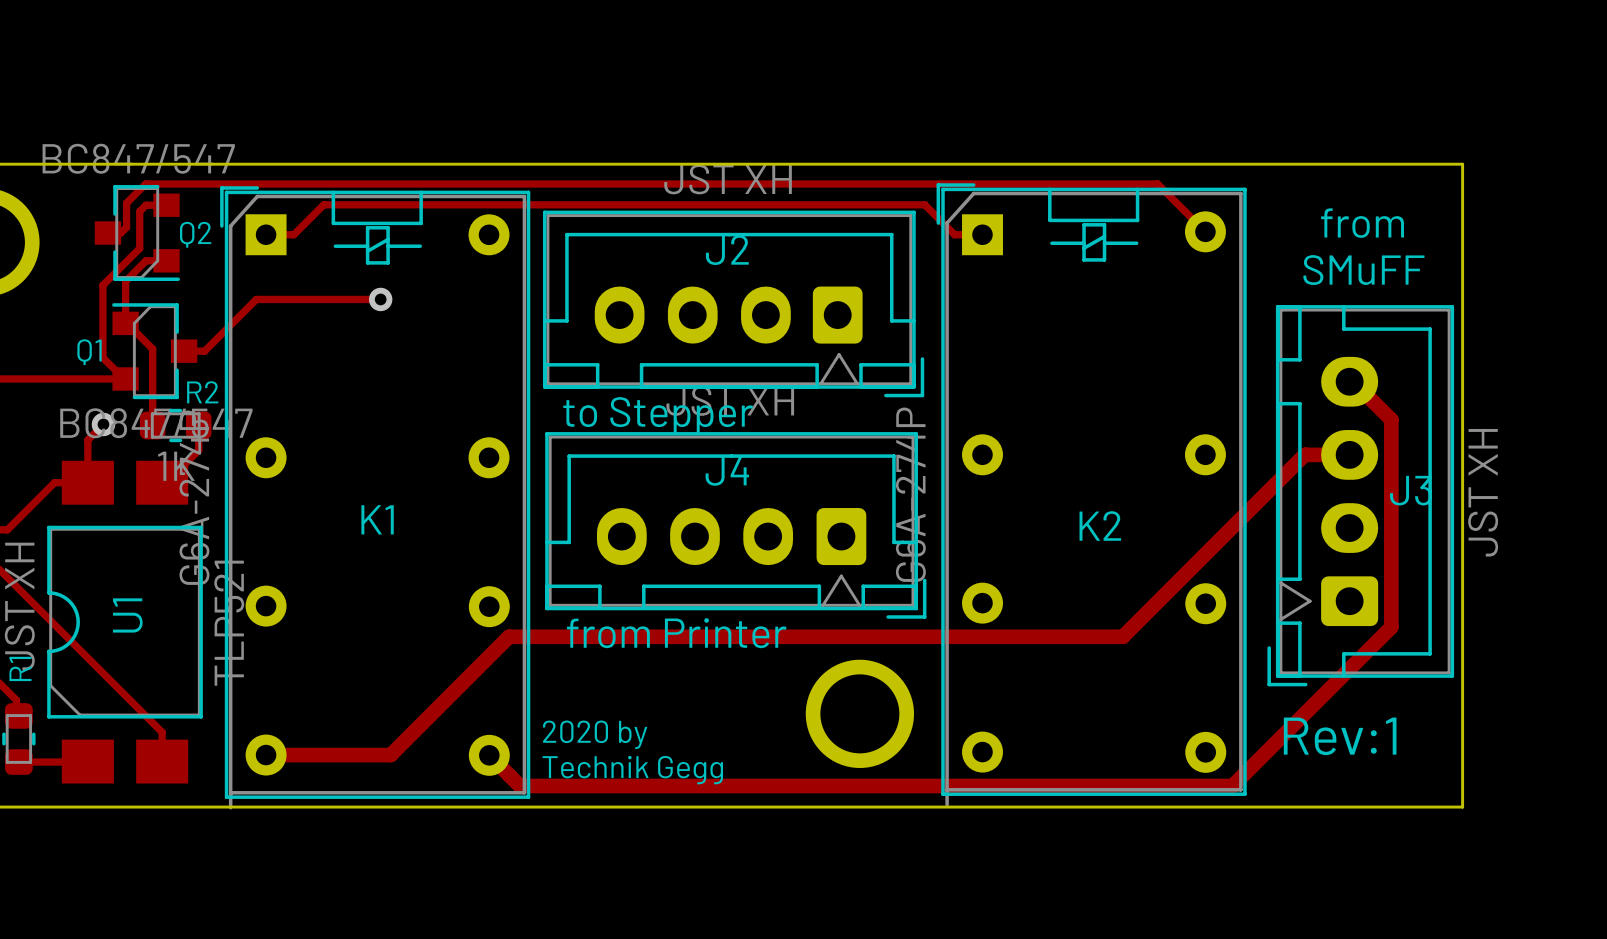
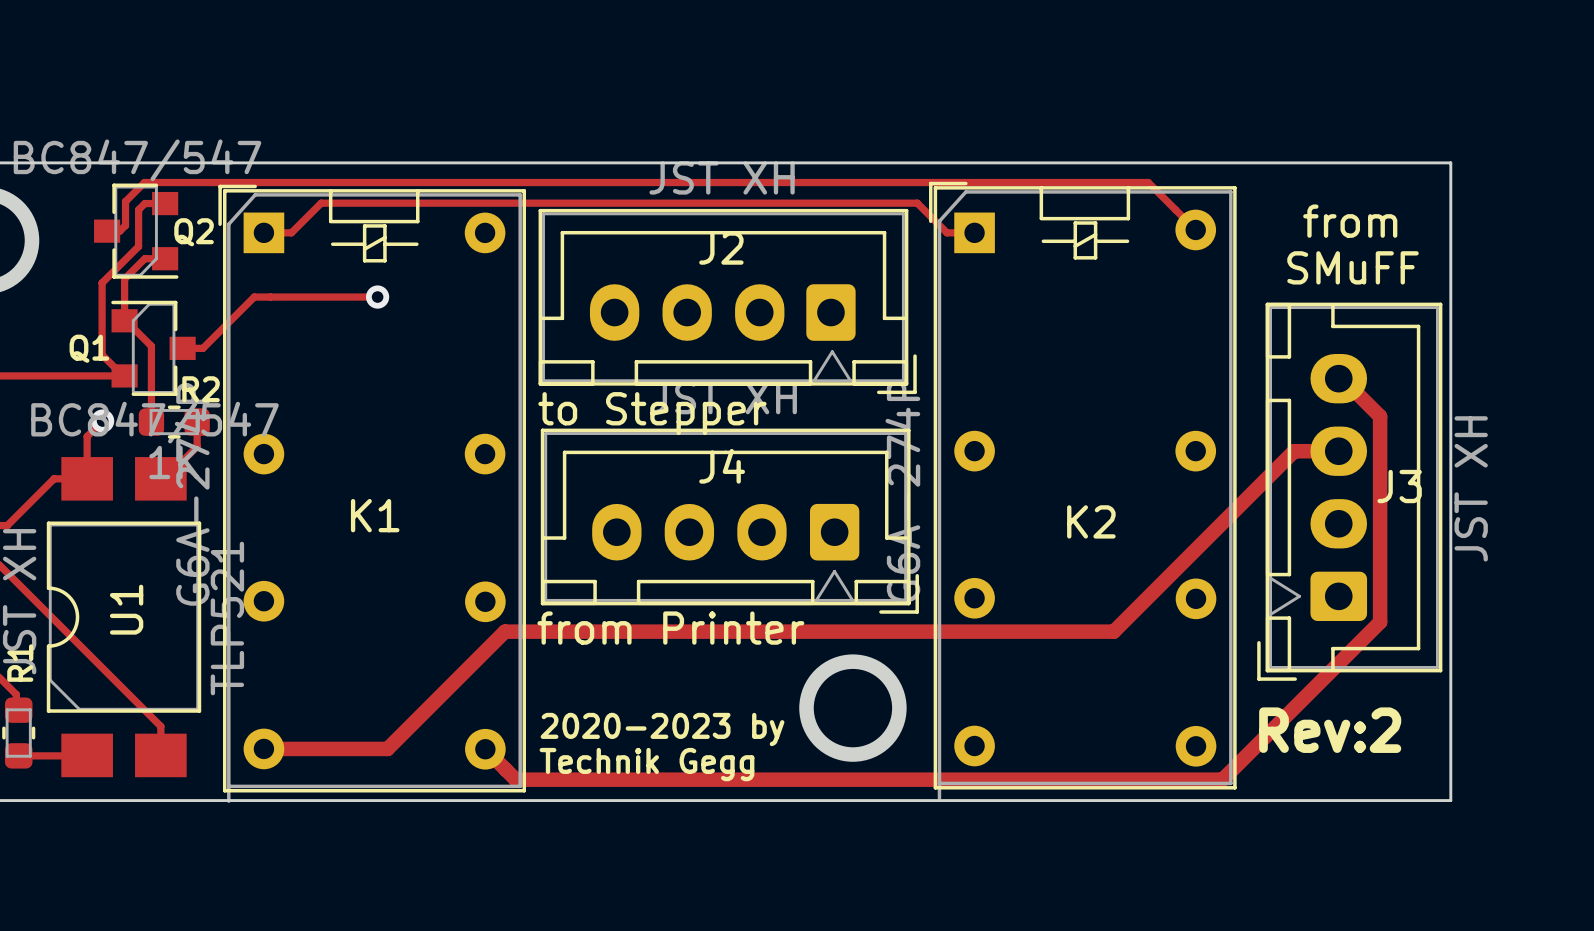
text: 2020 by (595, 734) -> 2020-2023 by (662, 729)
text: Rev:1 (1340, 736) -> Rev:2 (1330, 730)

